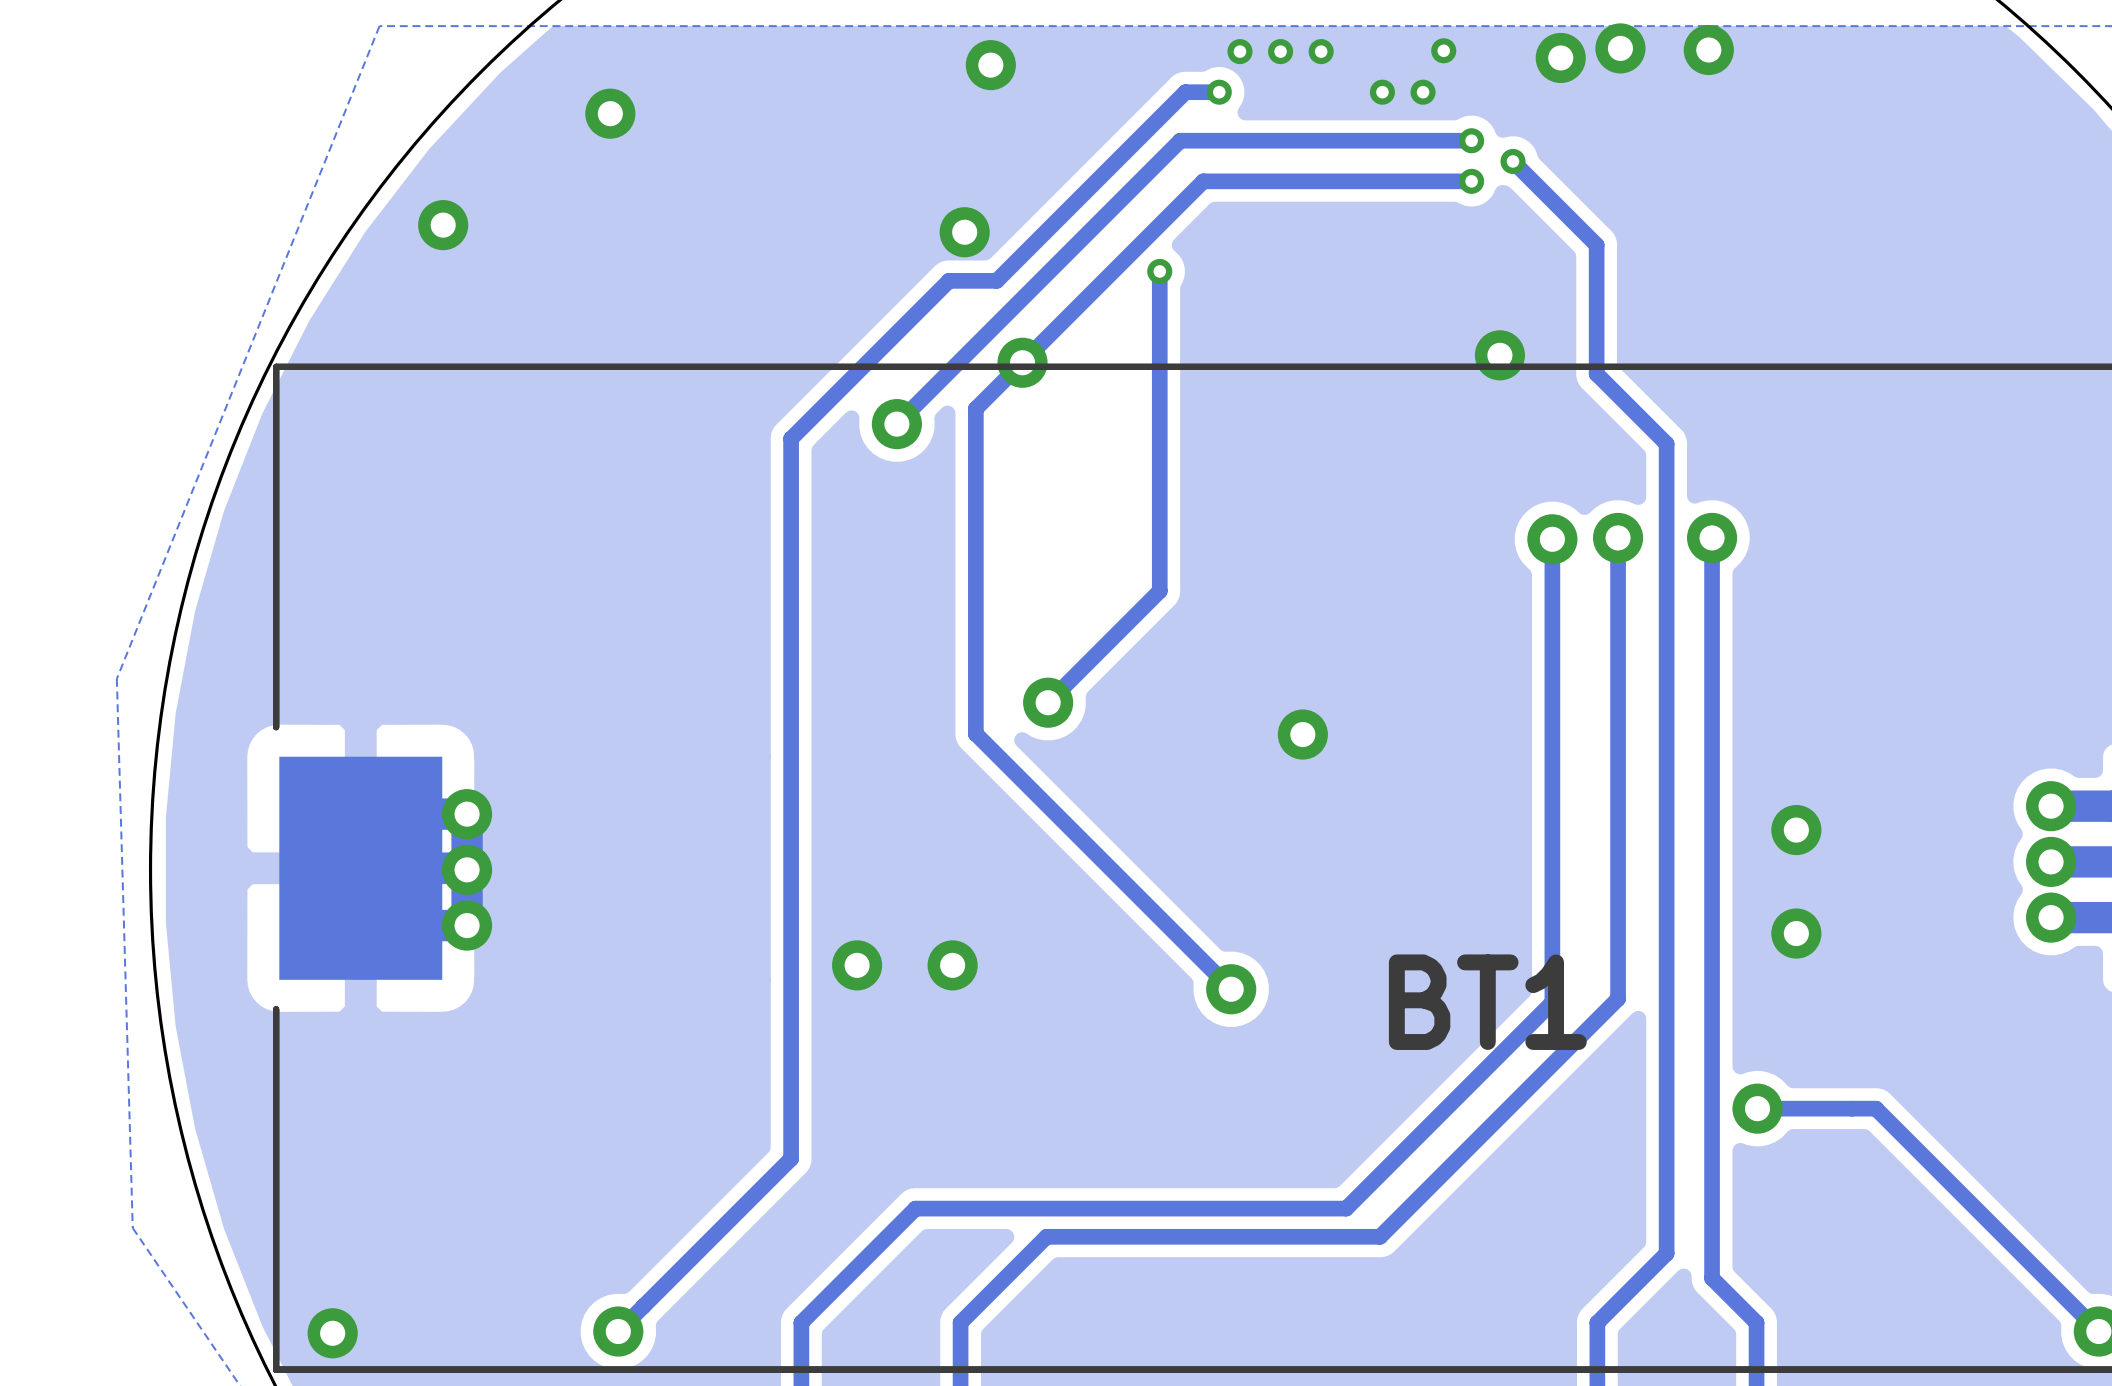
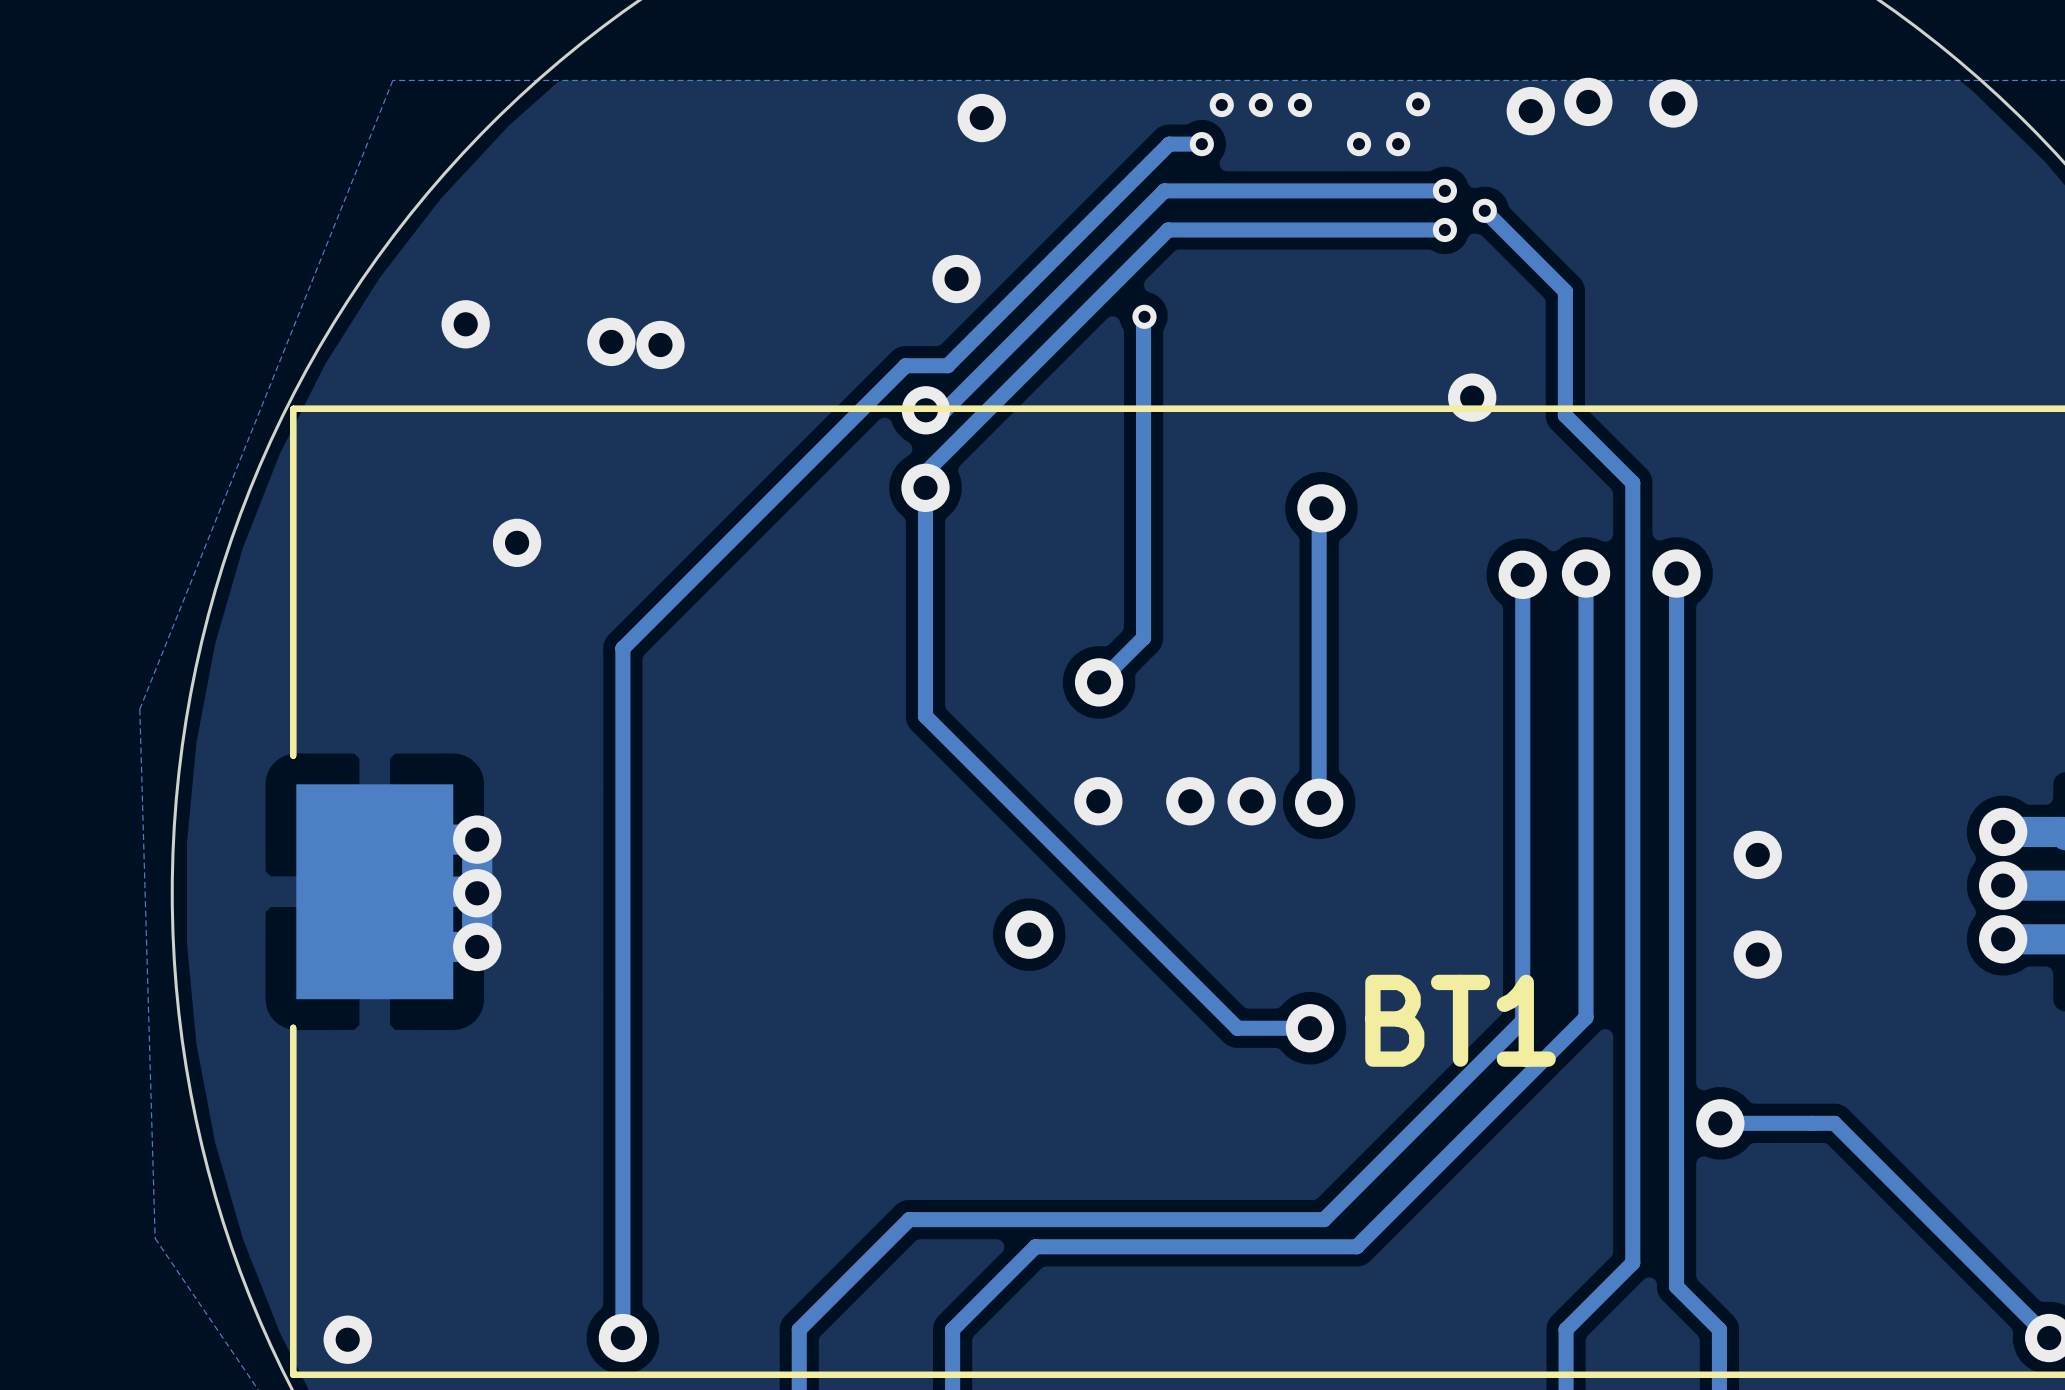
via: (610, 113) -> none
track: (1203, 181) (975, 408) (975, 733) (1231, 989) -> (1186, 229) (1168, 229) (925, 472) (925, 716) (1237, 1028) (1309, 1028)
via position: (443, 225) -> (465, 324)
track: (1159, 271) (1159, 591) (1048, 702) -> (1143, 315) (1143, 637) (1099, 682)
track: (996, 280) (949, 280) (791, 438) (791, 1158) (618, 1331) -> (987, 325) (947, 365) (905, 365) (622, 648) (622, 1338)
via: none -> (611, 341)
via: none -> (660, 345)
via: (1022, 362) -> none
via: none -> (925, 410)
via position: (896, 424) -> (925, 487)
track: none -> (1321, 508) (1319, 510) (1319, 802)
via: none -> (1321, 508)
via: none -> (517, 542)
via: none -> (1099, 682)
via: (1048, 702) -> none
via: (1302, 734) -> none
via: none -> (1098, 801)
via: none -> (1190, 801)
via: none -> (1251, 801)
via: none -> (1319, 802)
via: none -> (1029, 934)
via: (857, 965) -> none
via: (952, 965) -> none
via: (1231, 989) -> none
via: none -> (1309, 1028)

